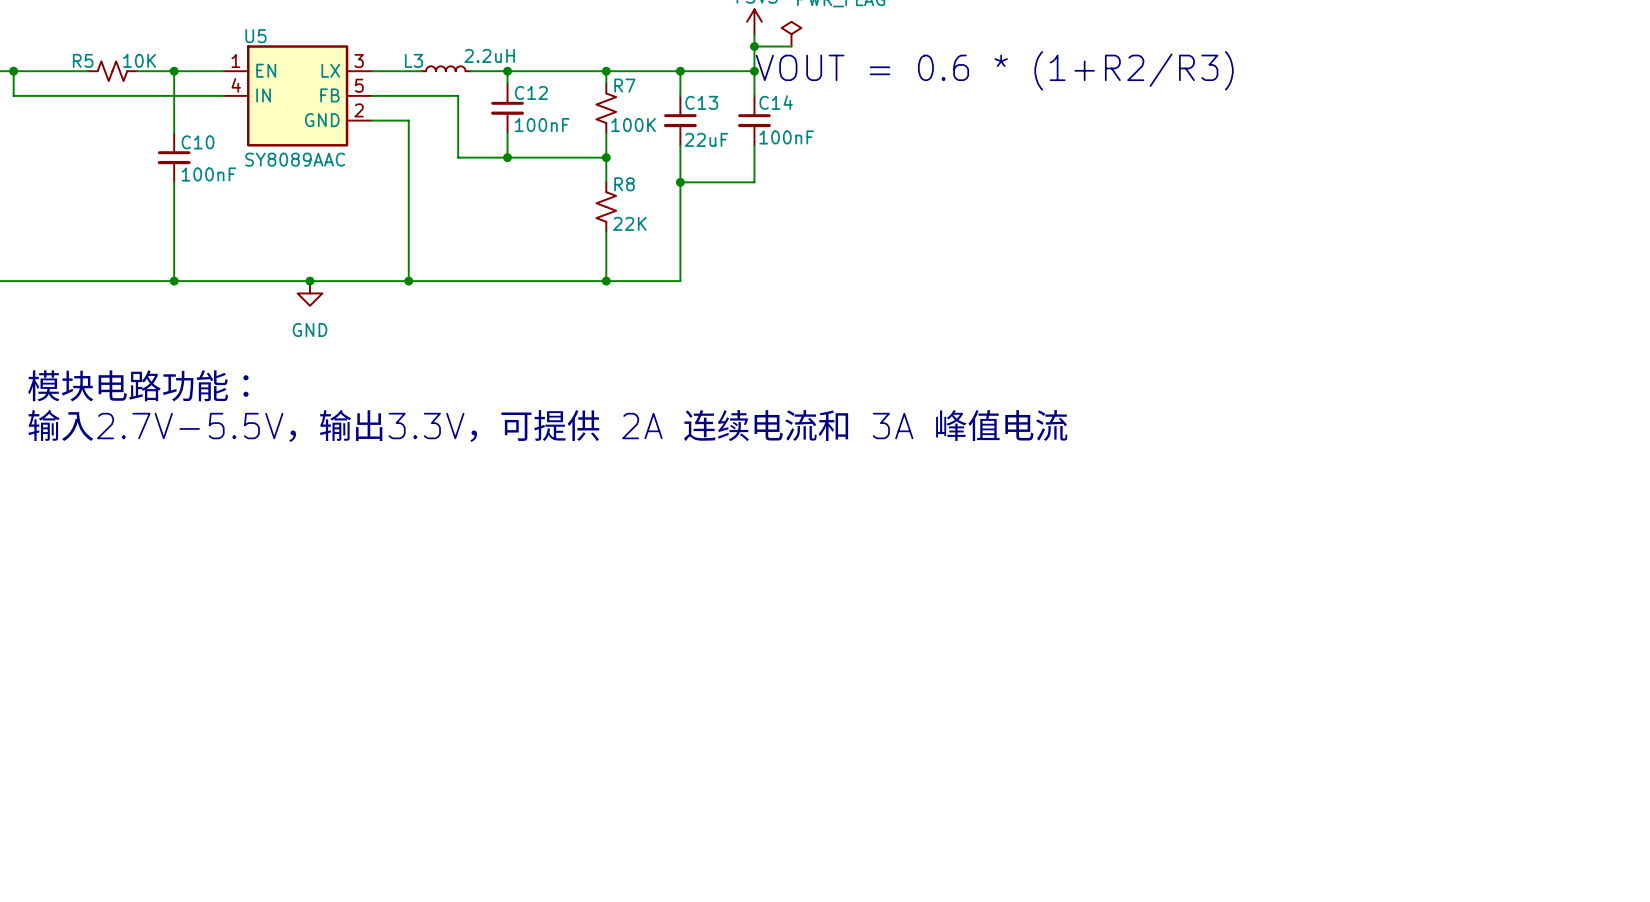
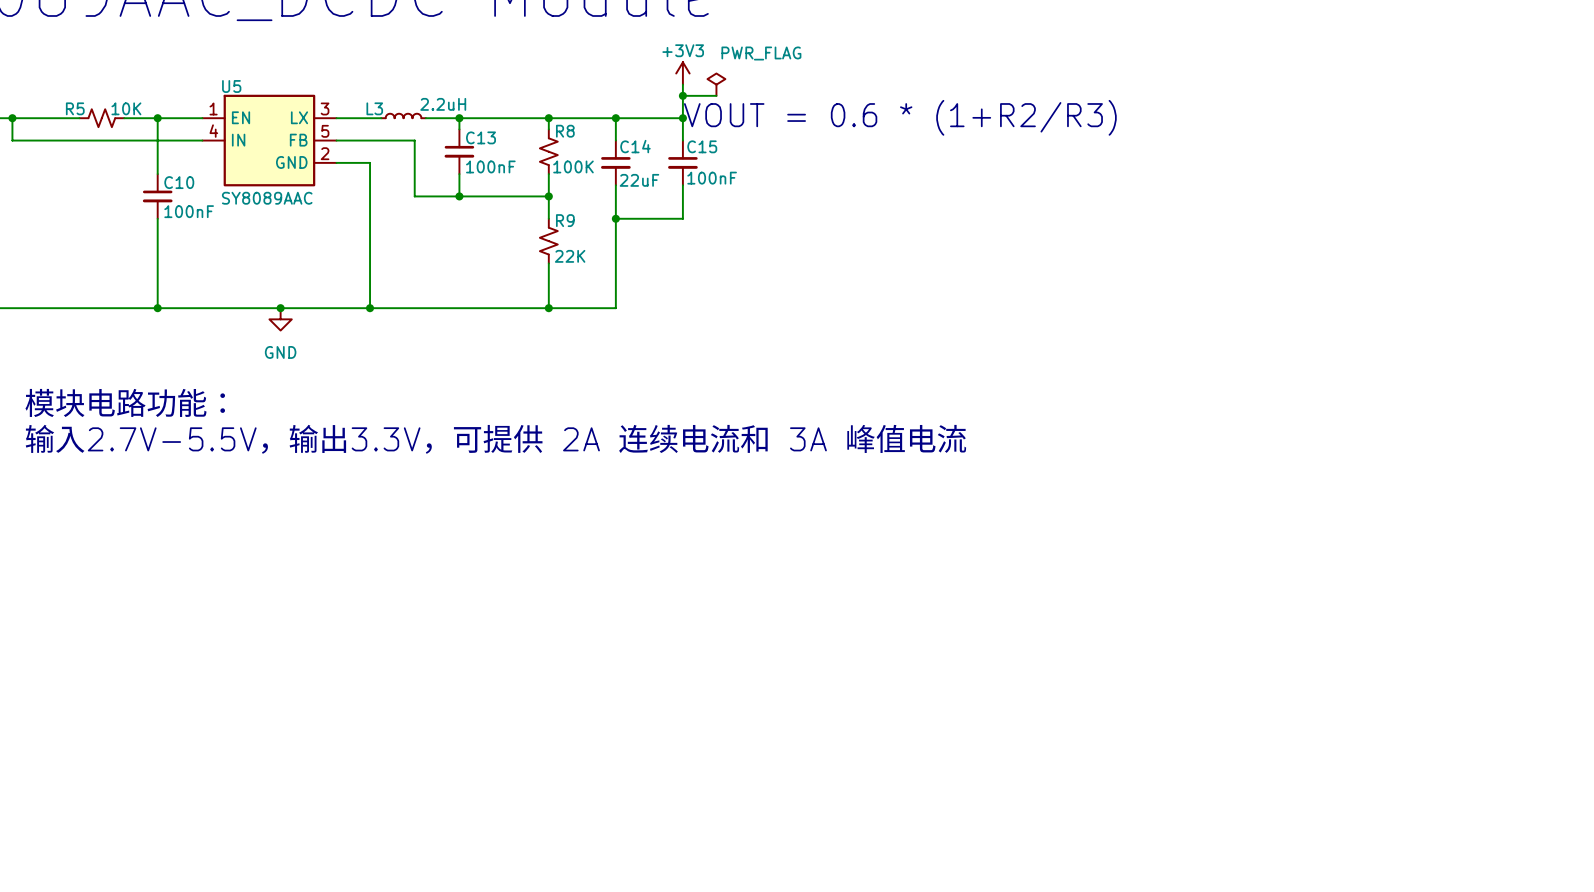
R7 name: R7 (624, 85) -> R8 (565, 131)
C12 name: C12 (531, 92) -> C13 (481, 137)
C13 name: C13 (701, 102) -> C14 (635, 146)
C14 name: C14 (776, 102) -> C15 (702, 146)
R8 name: R8 (624, 184) -> R9 (565, 220)

